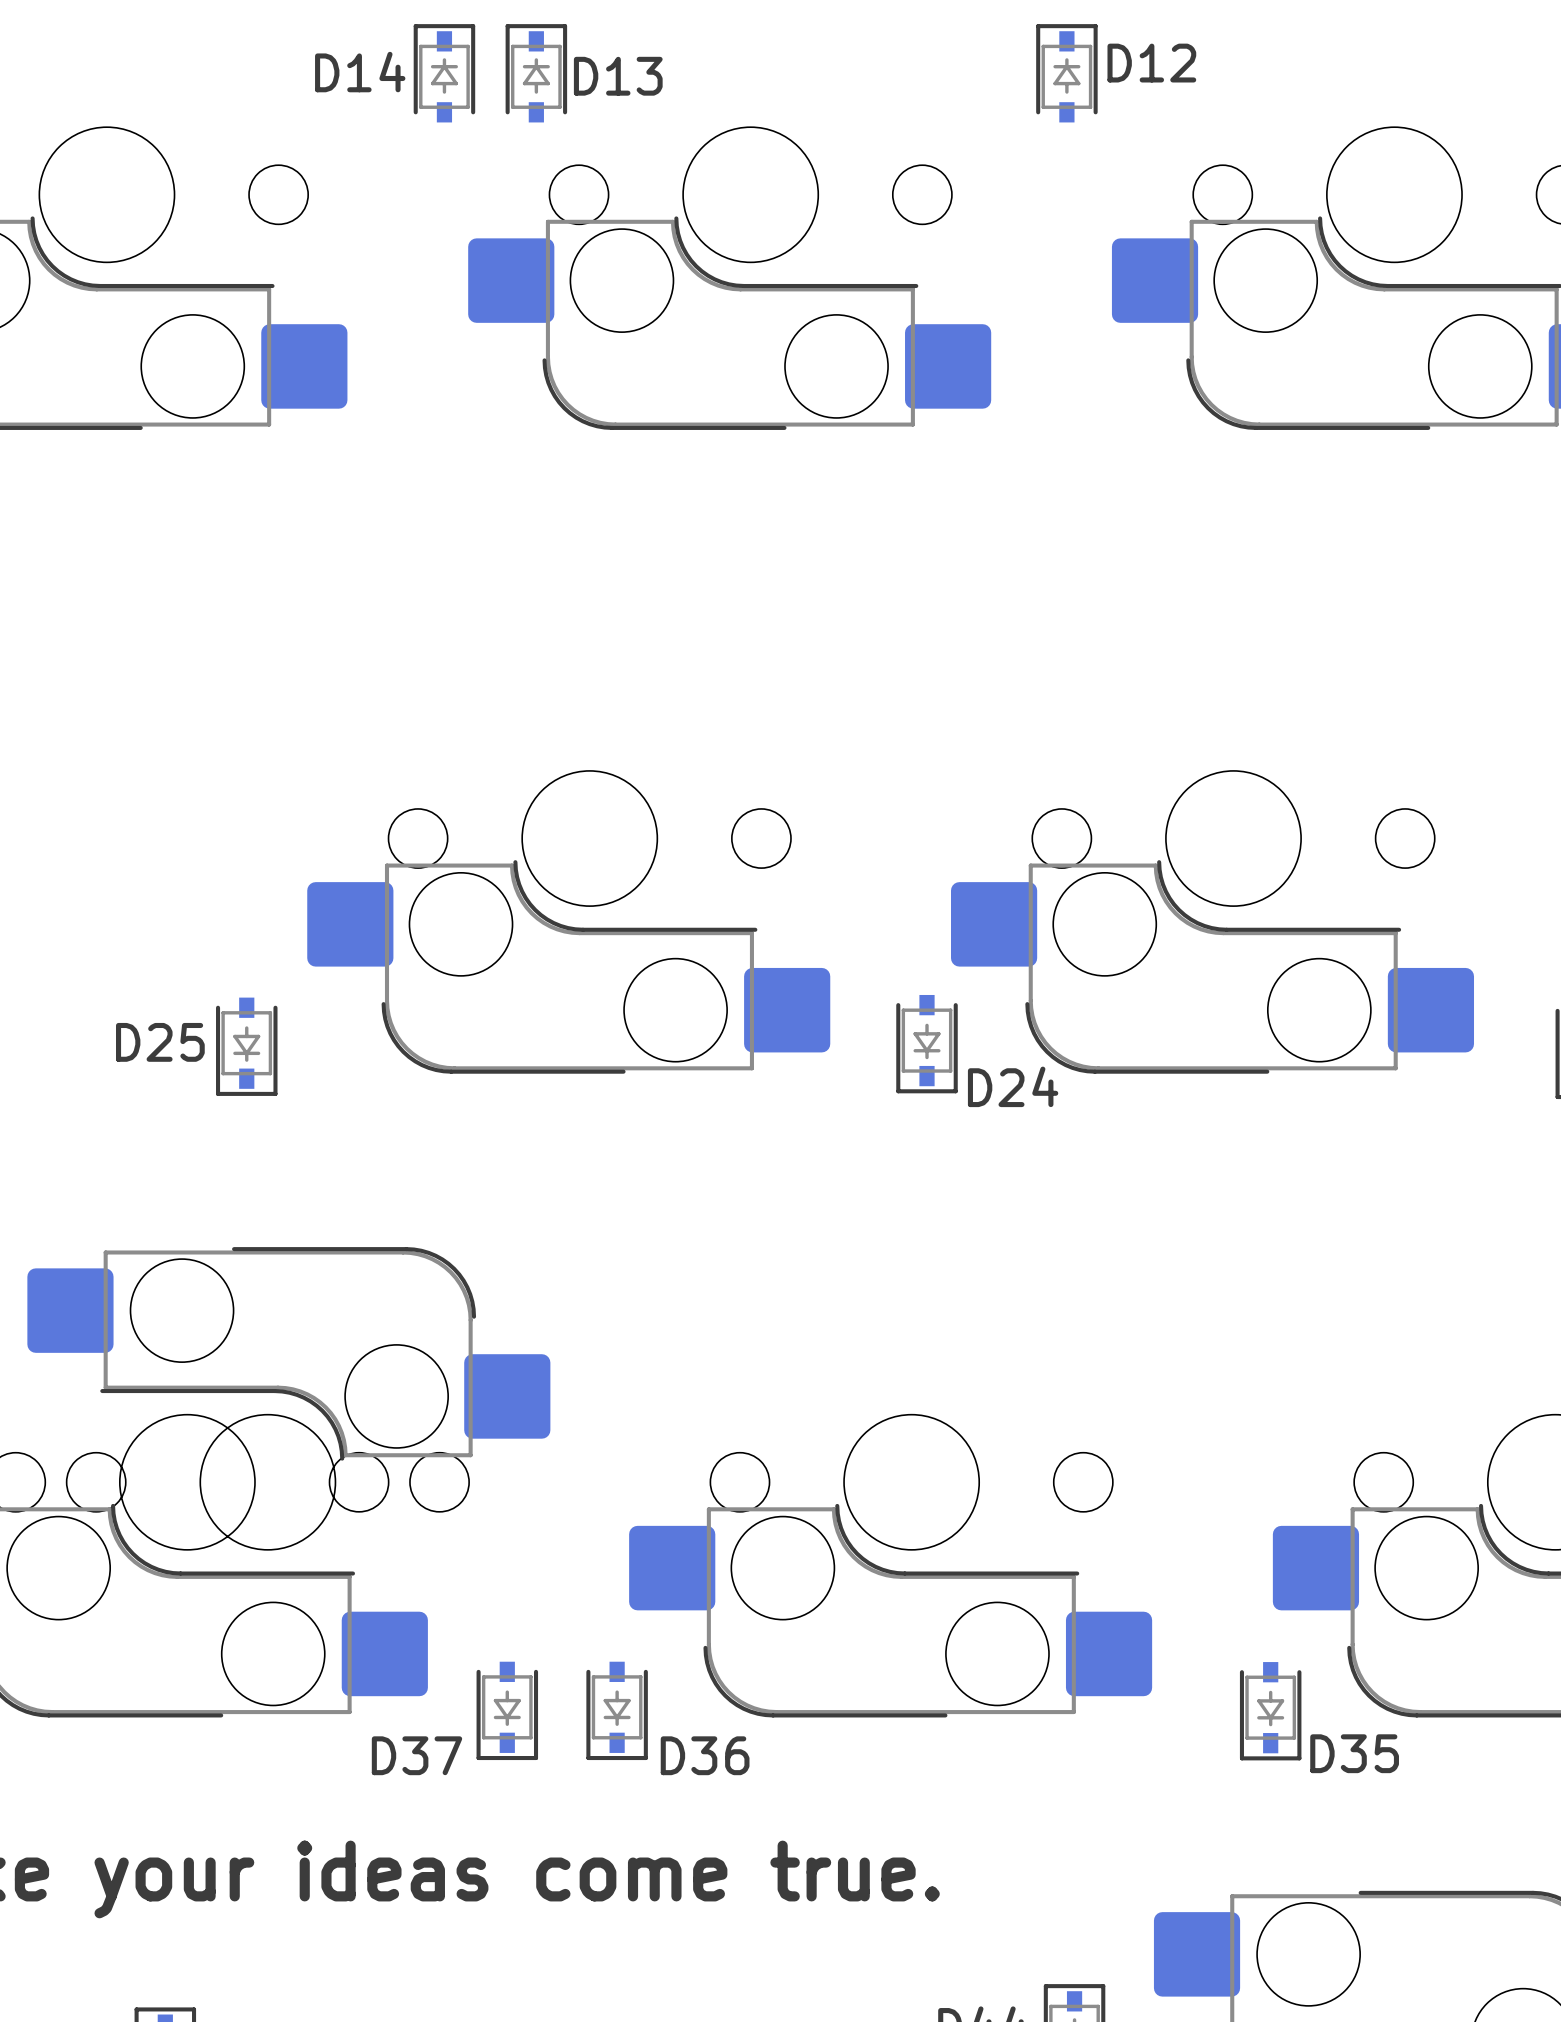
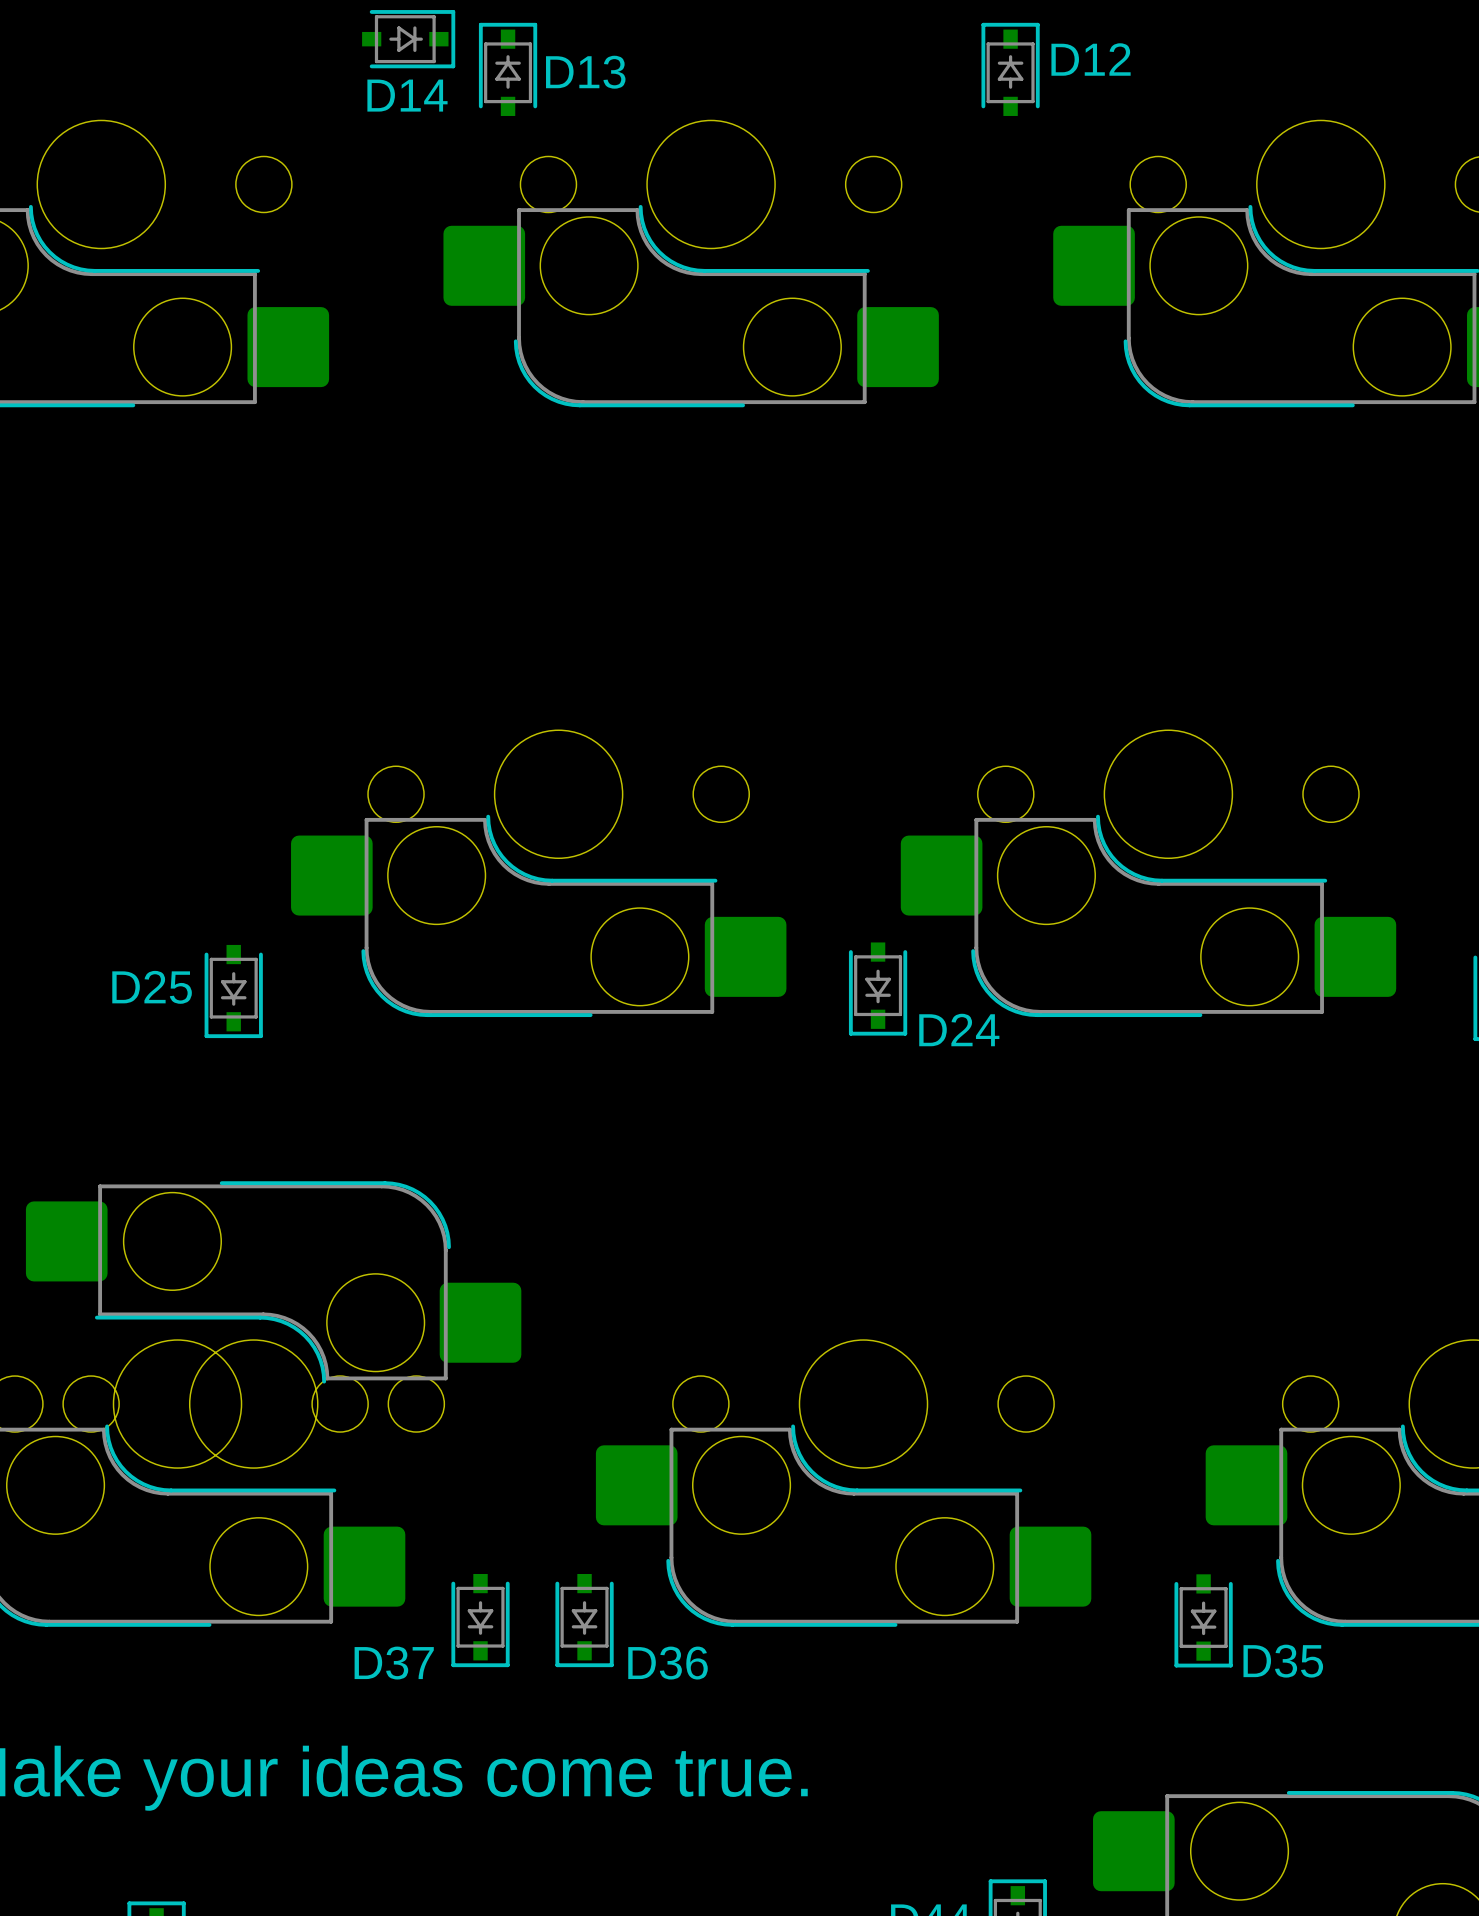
D14 name position: D14 (360, 72) -> D14 (407, 95)
D14 rotation: 0° (444, 73) -> 90° clockwise (408, 39)

